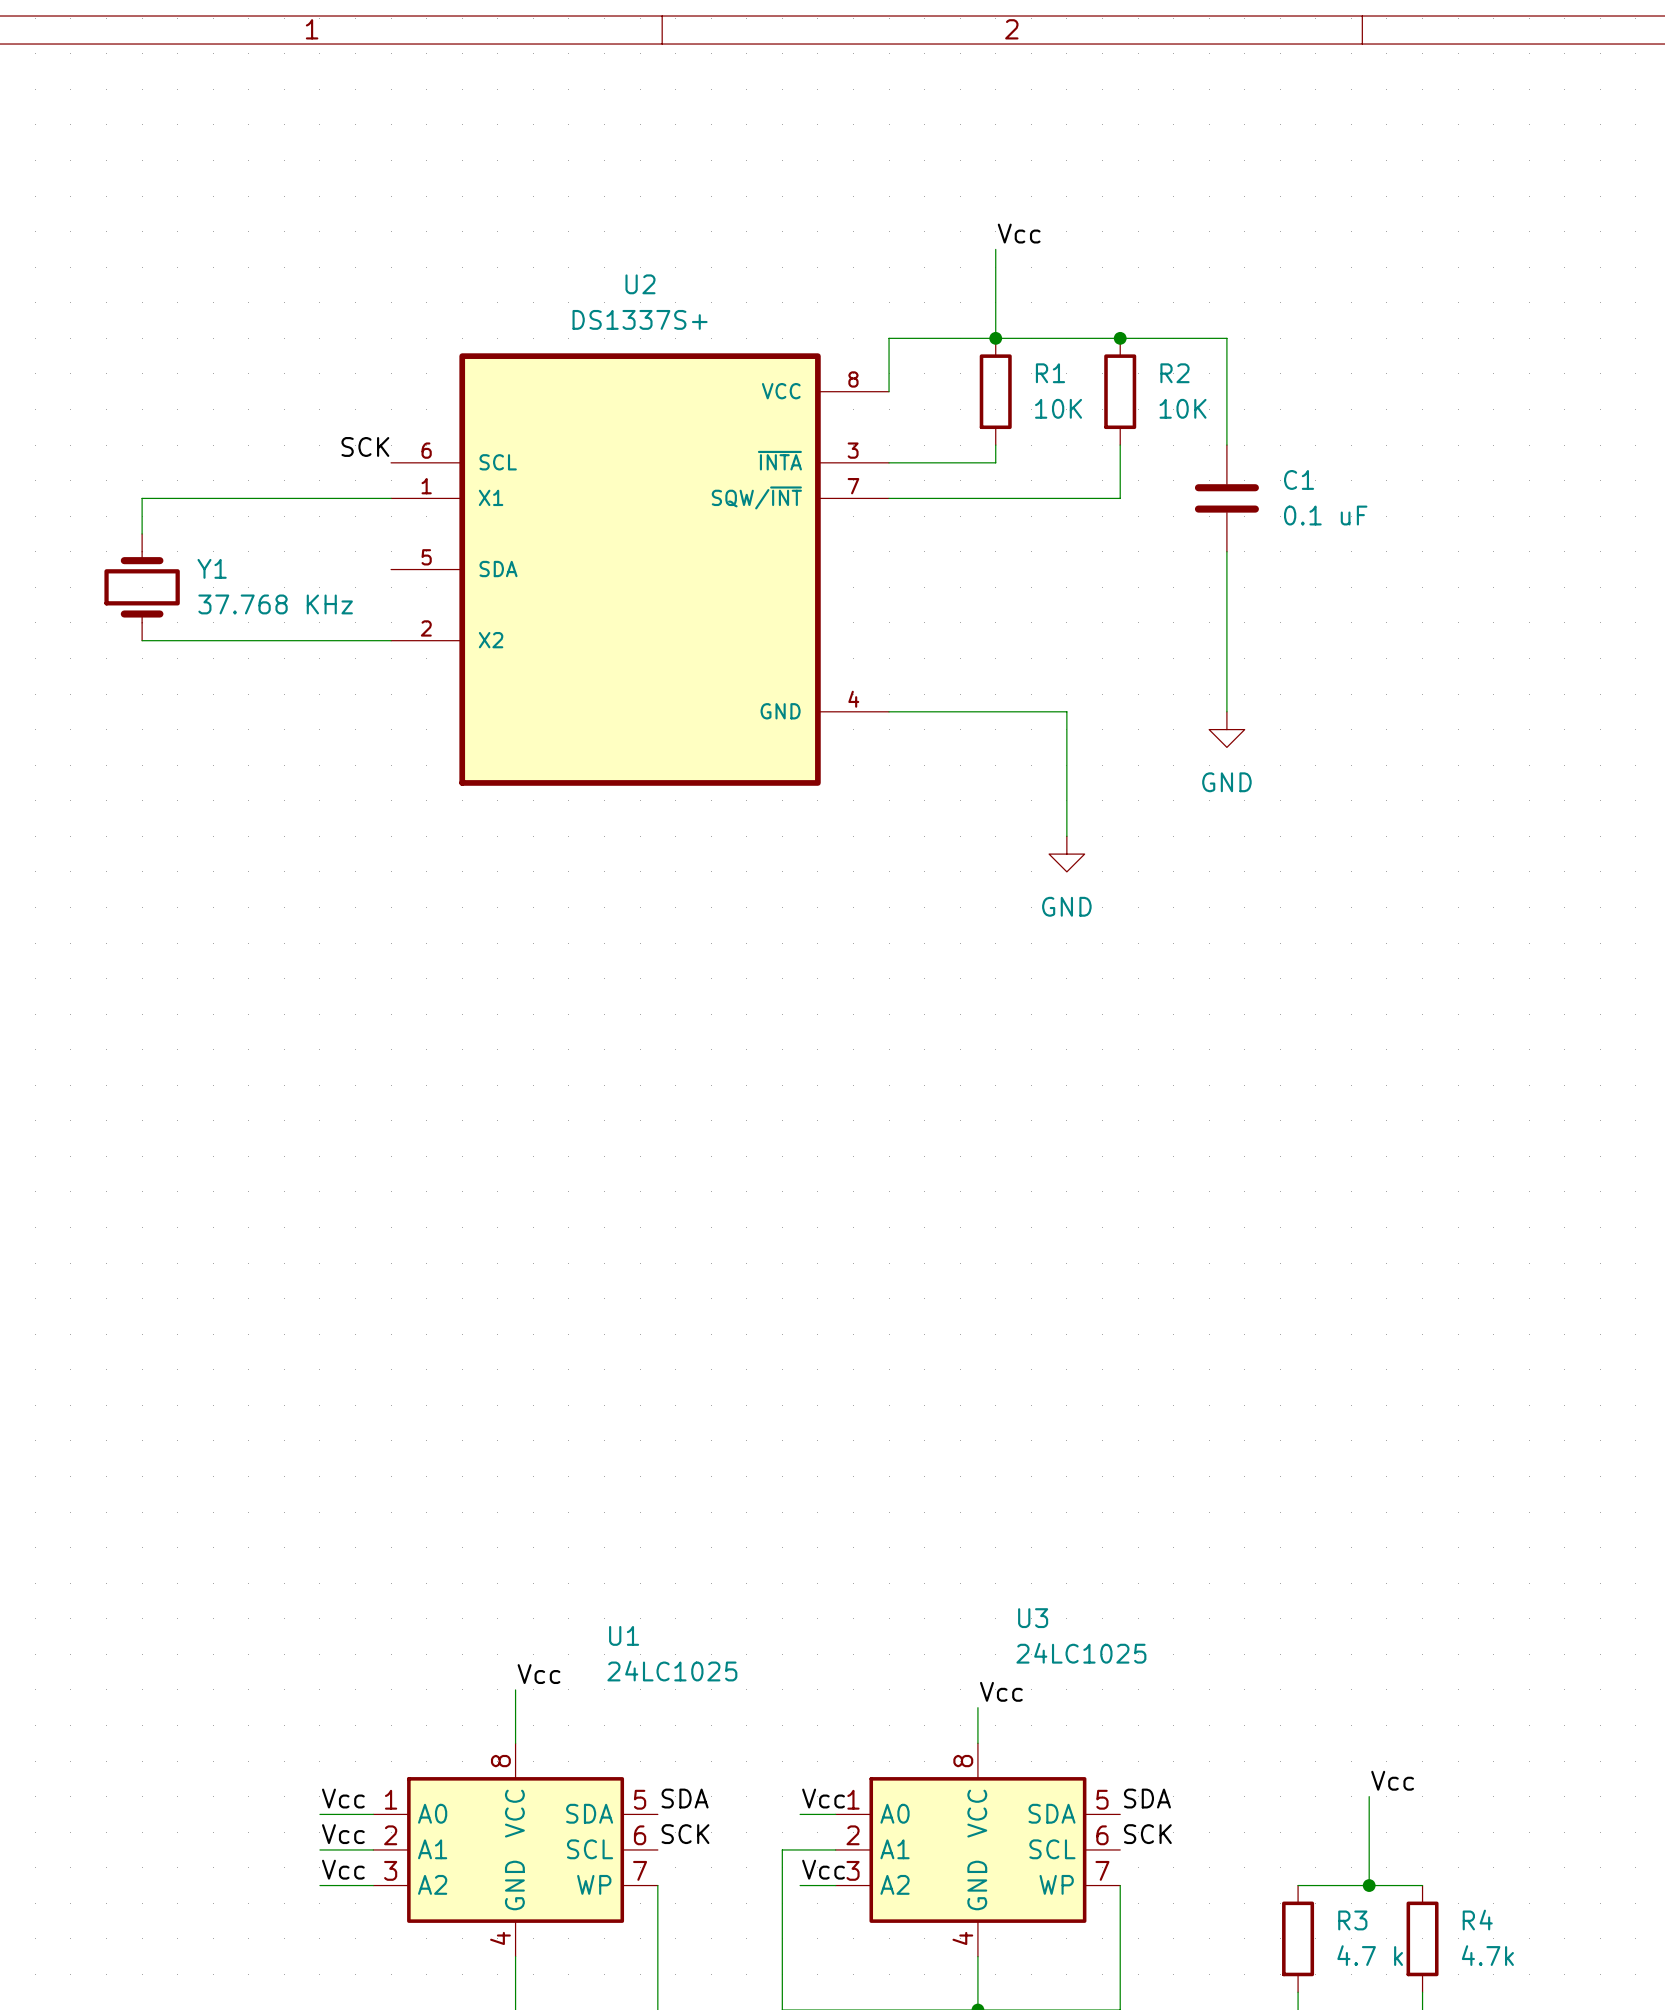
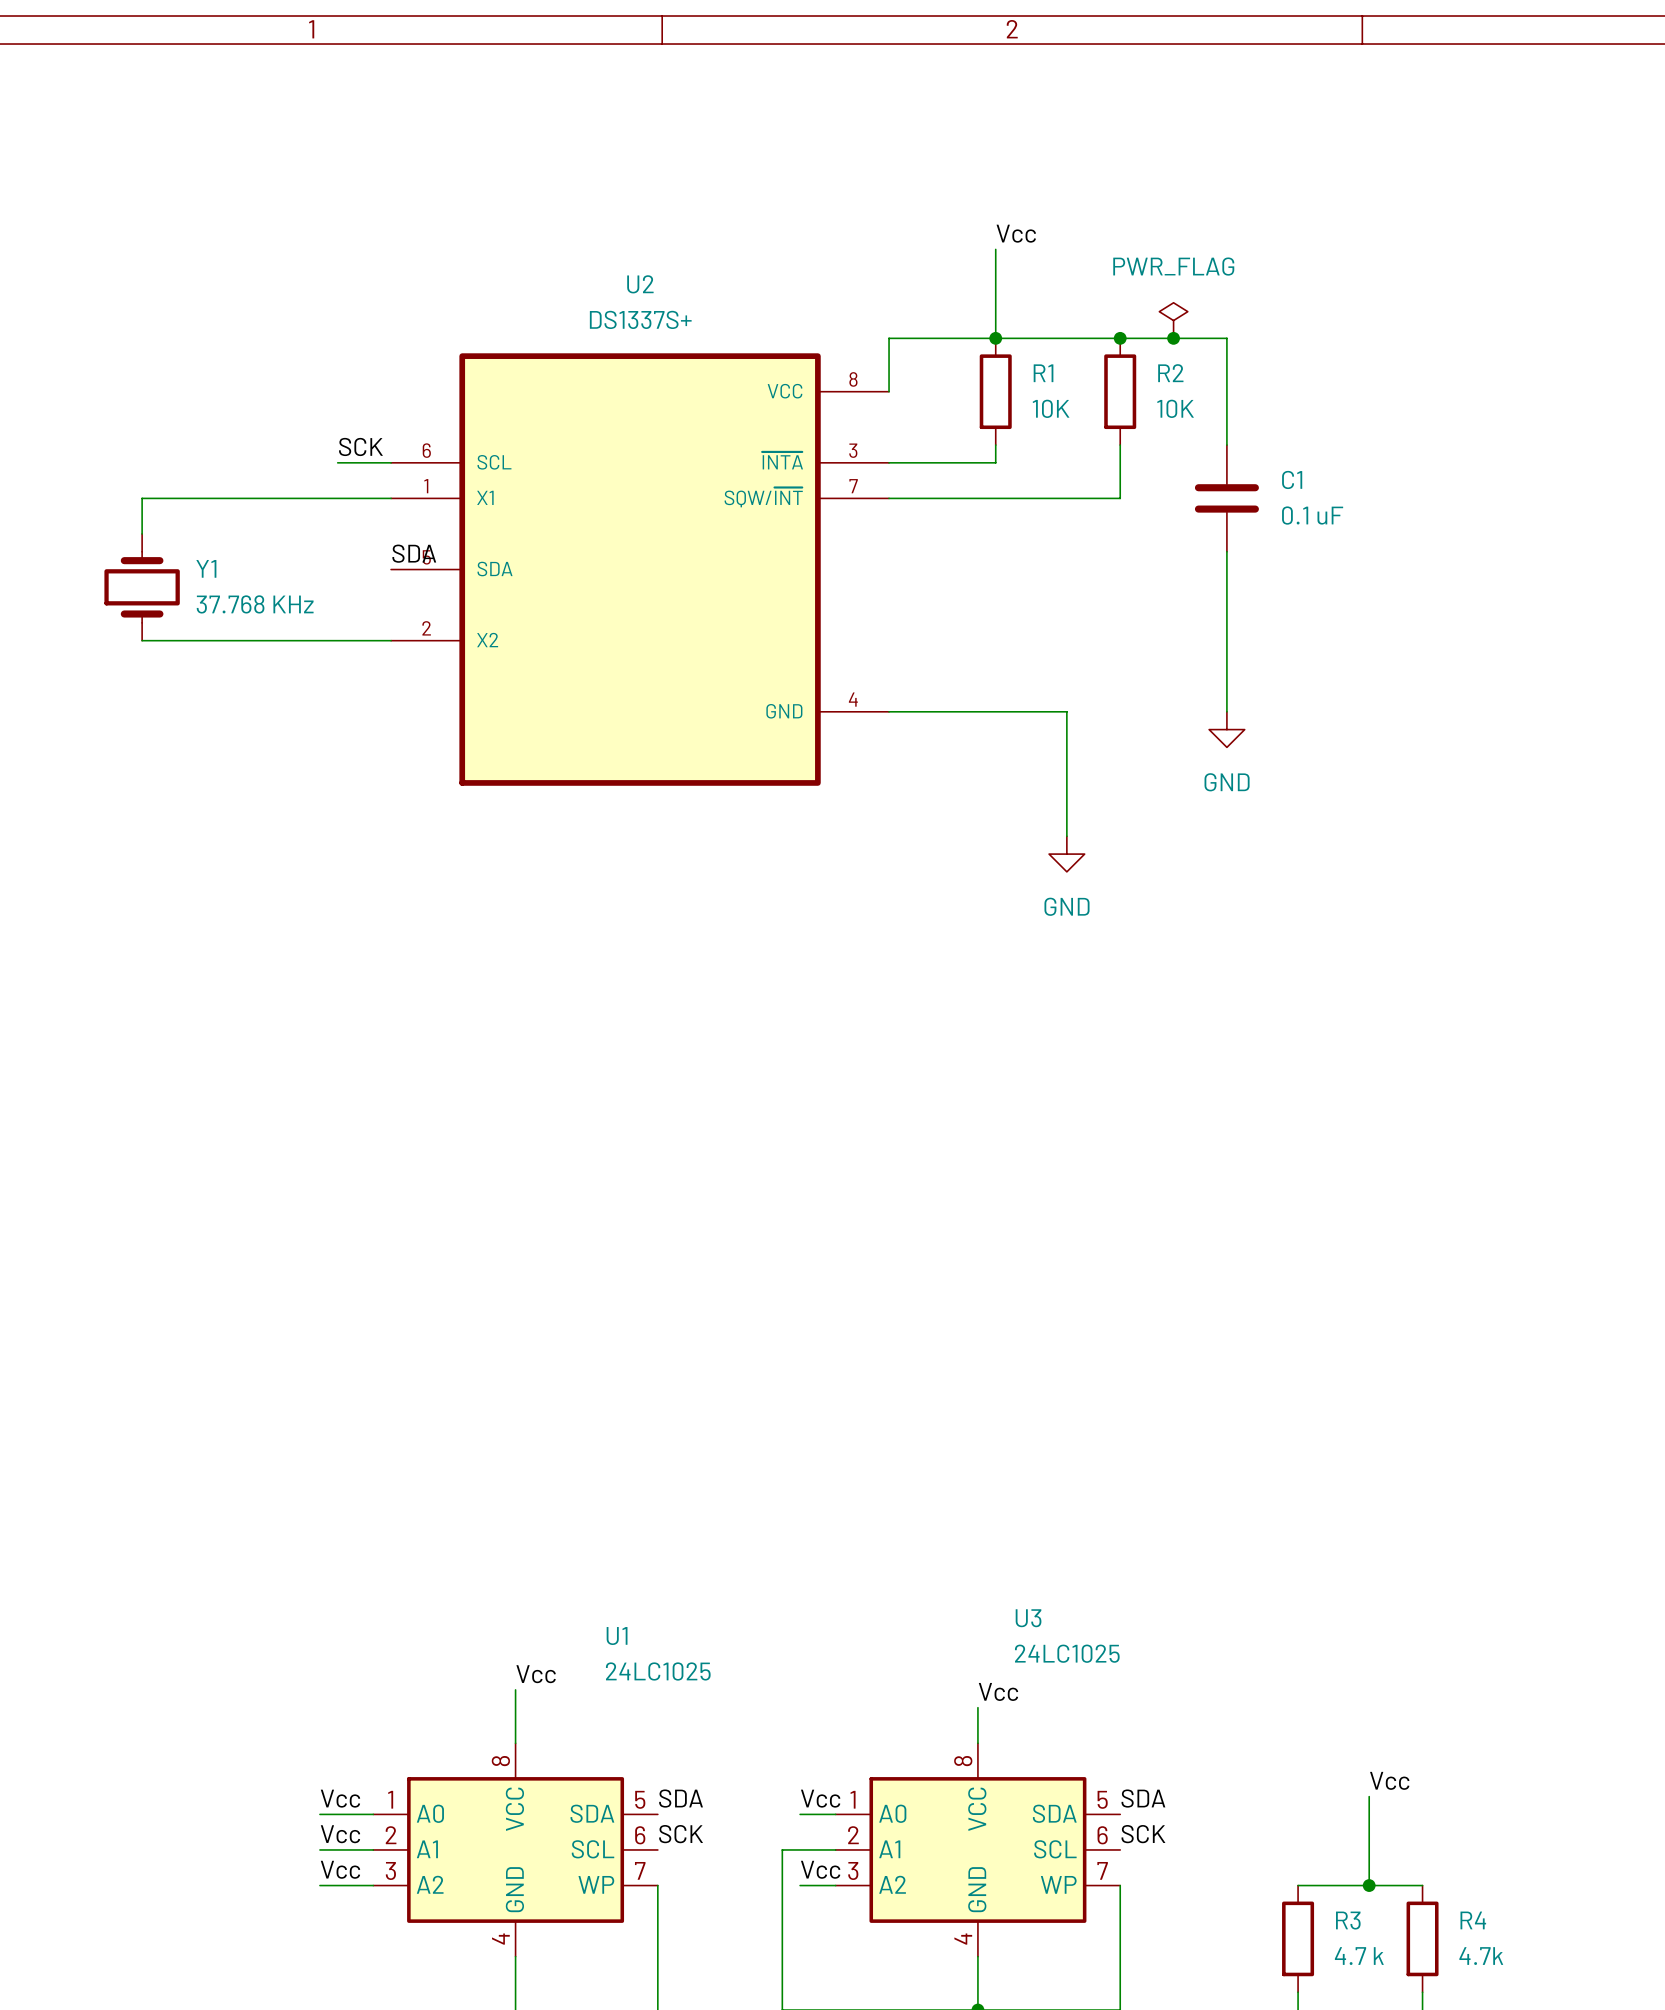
power symbol: none -> PWR_FLAG (1173, 320)
junction: none -> (1173, 338)
wire: none -> (337, 462) (391, 462)
label: none -> SDA (414, 553)

